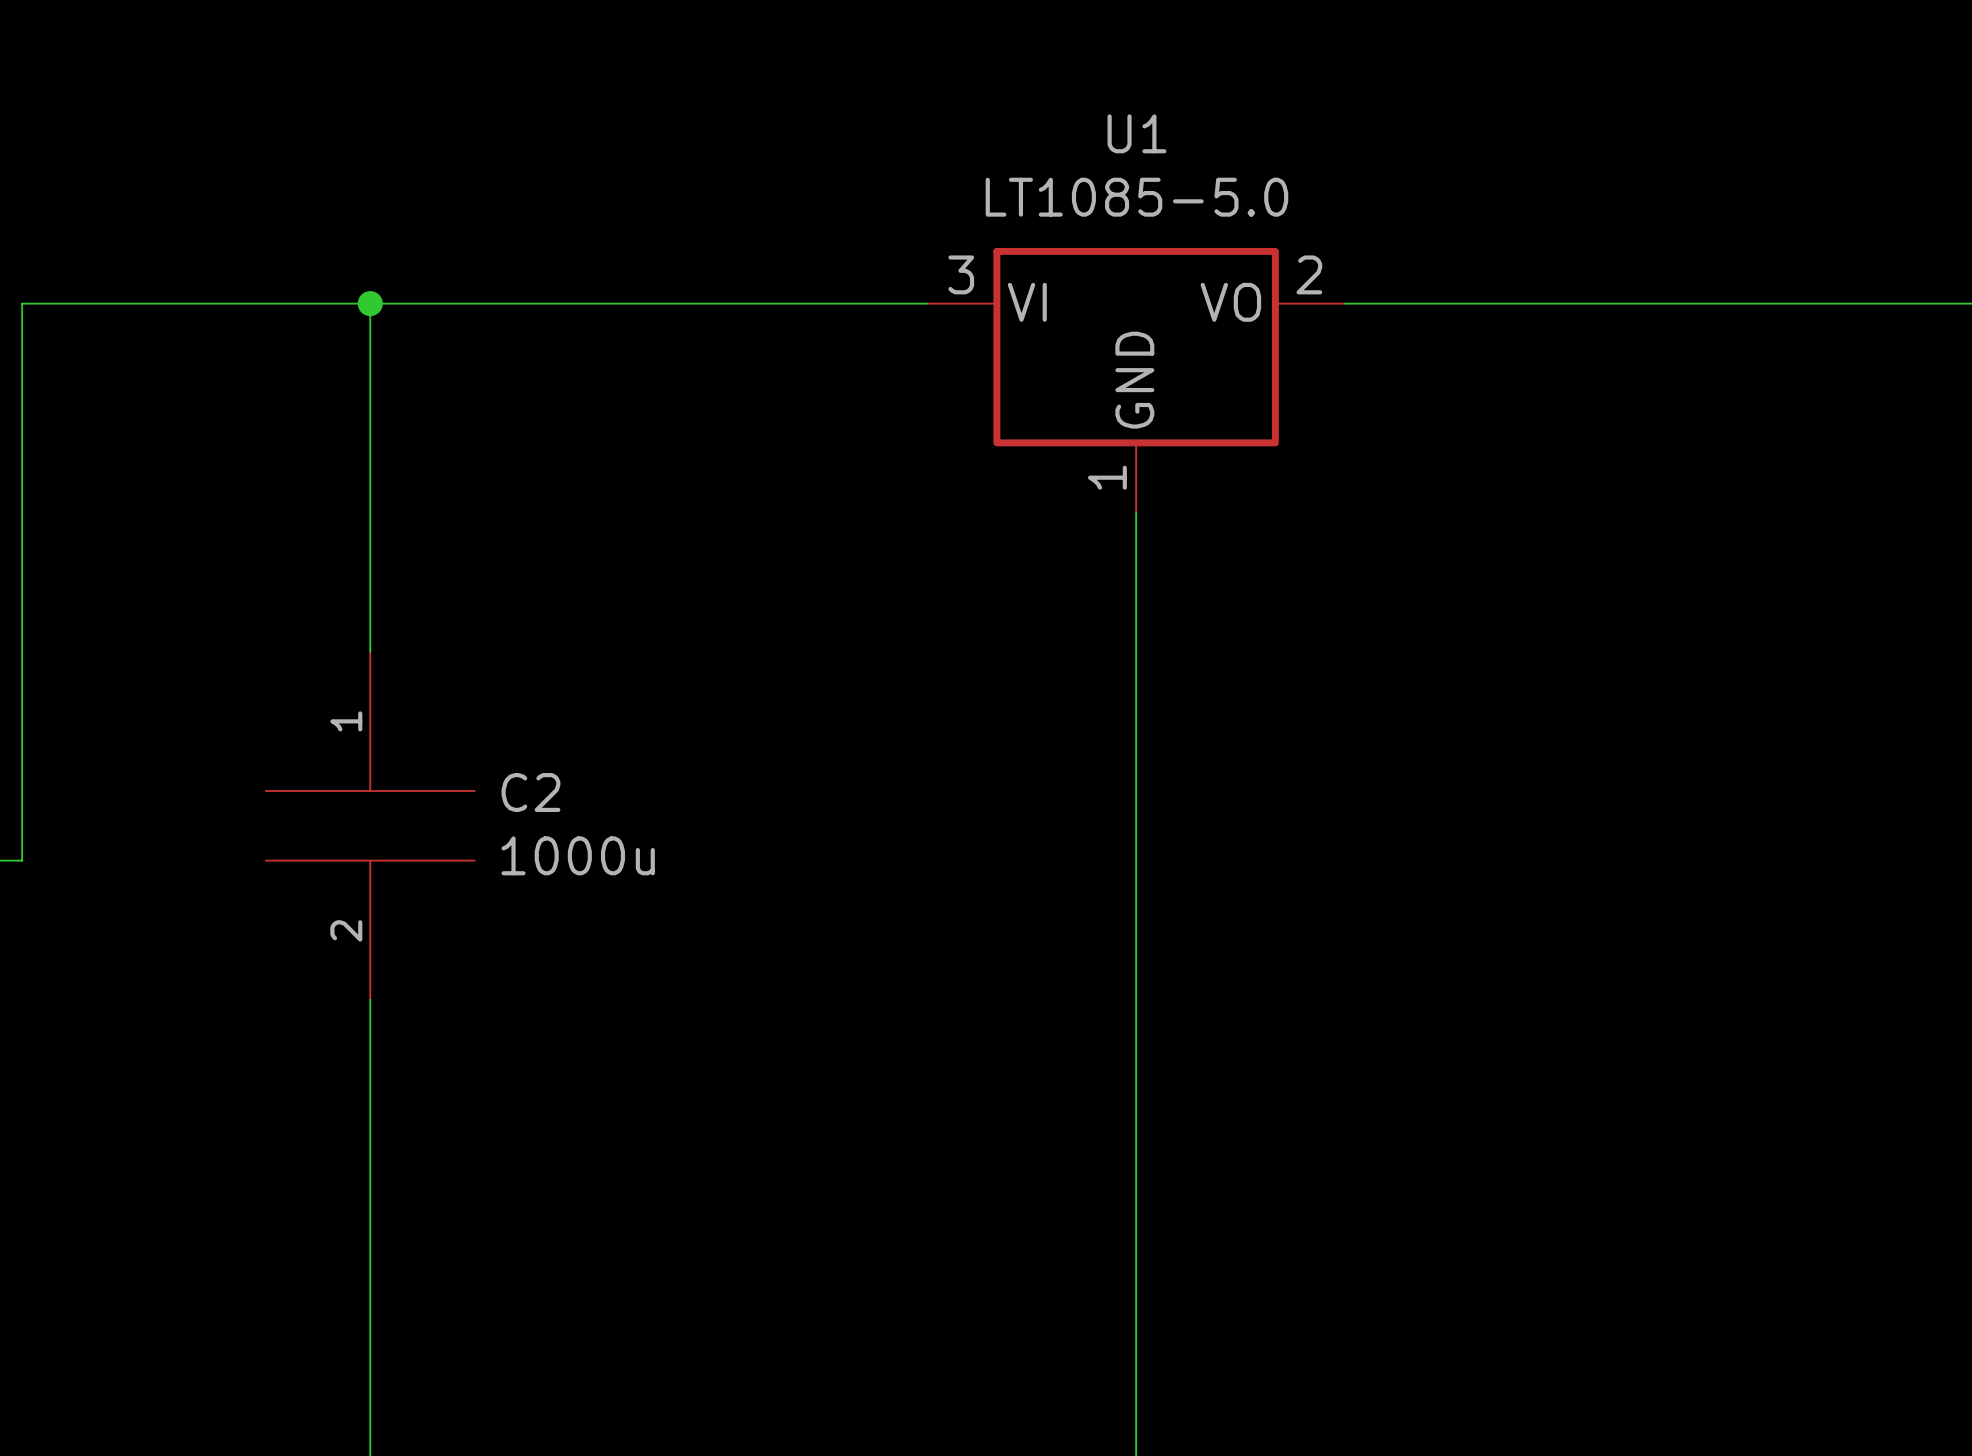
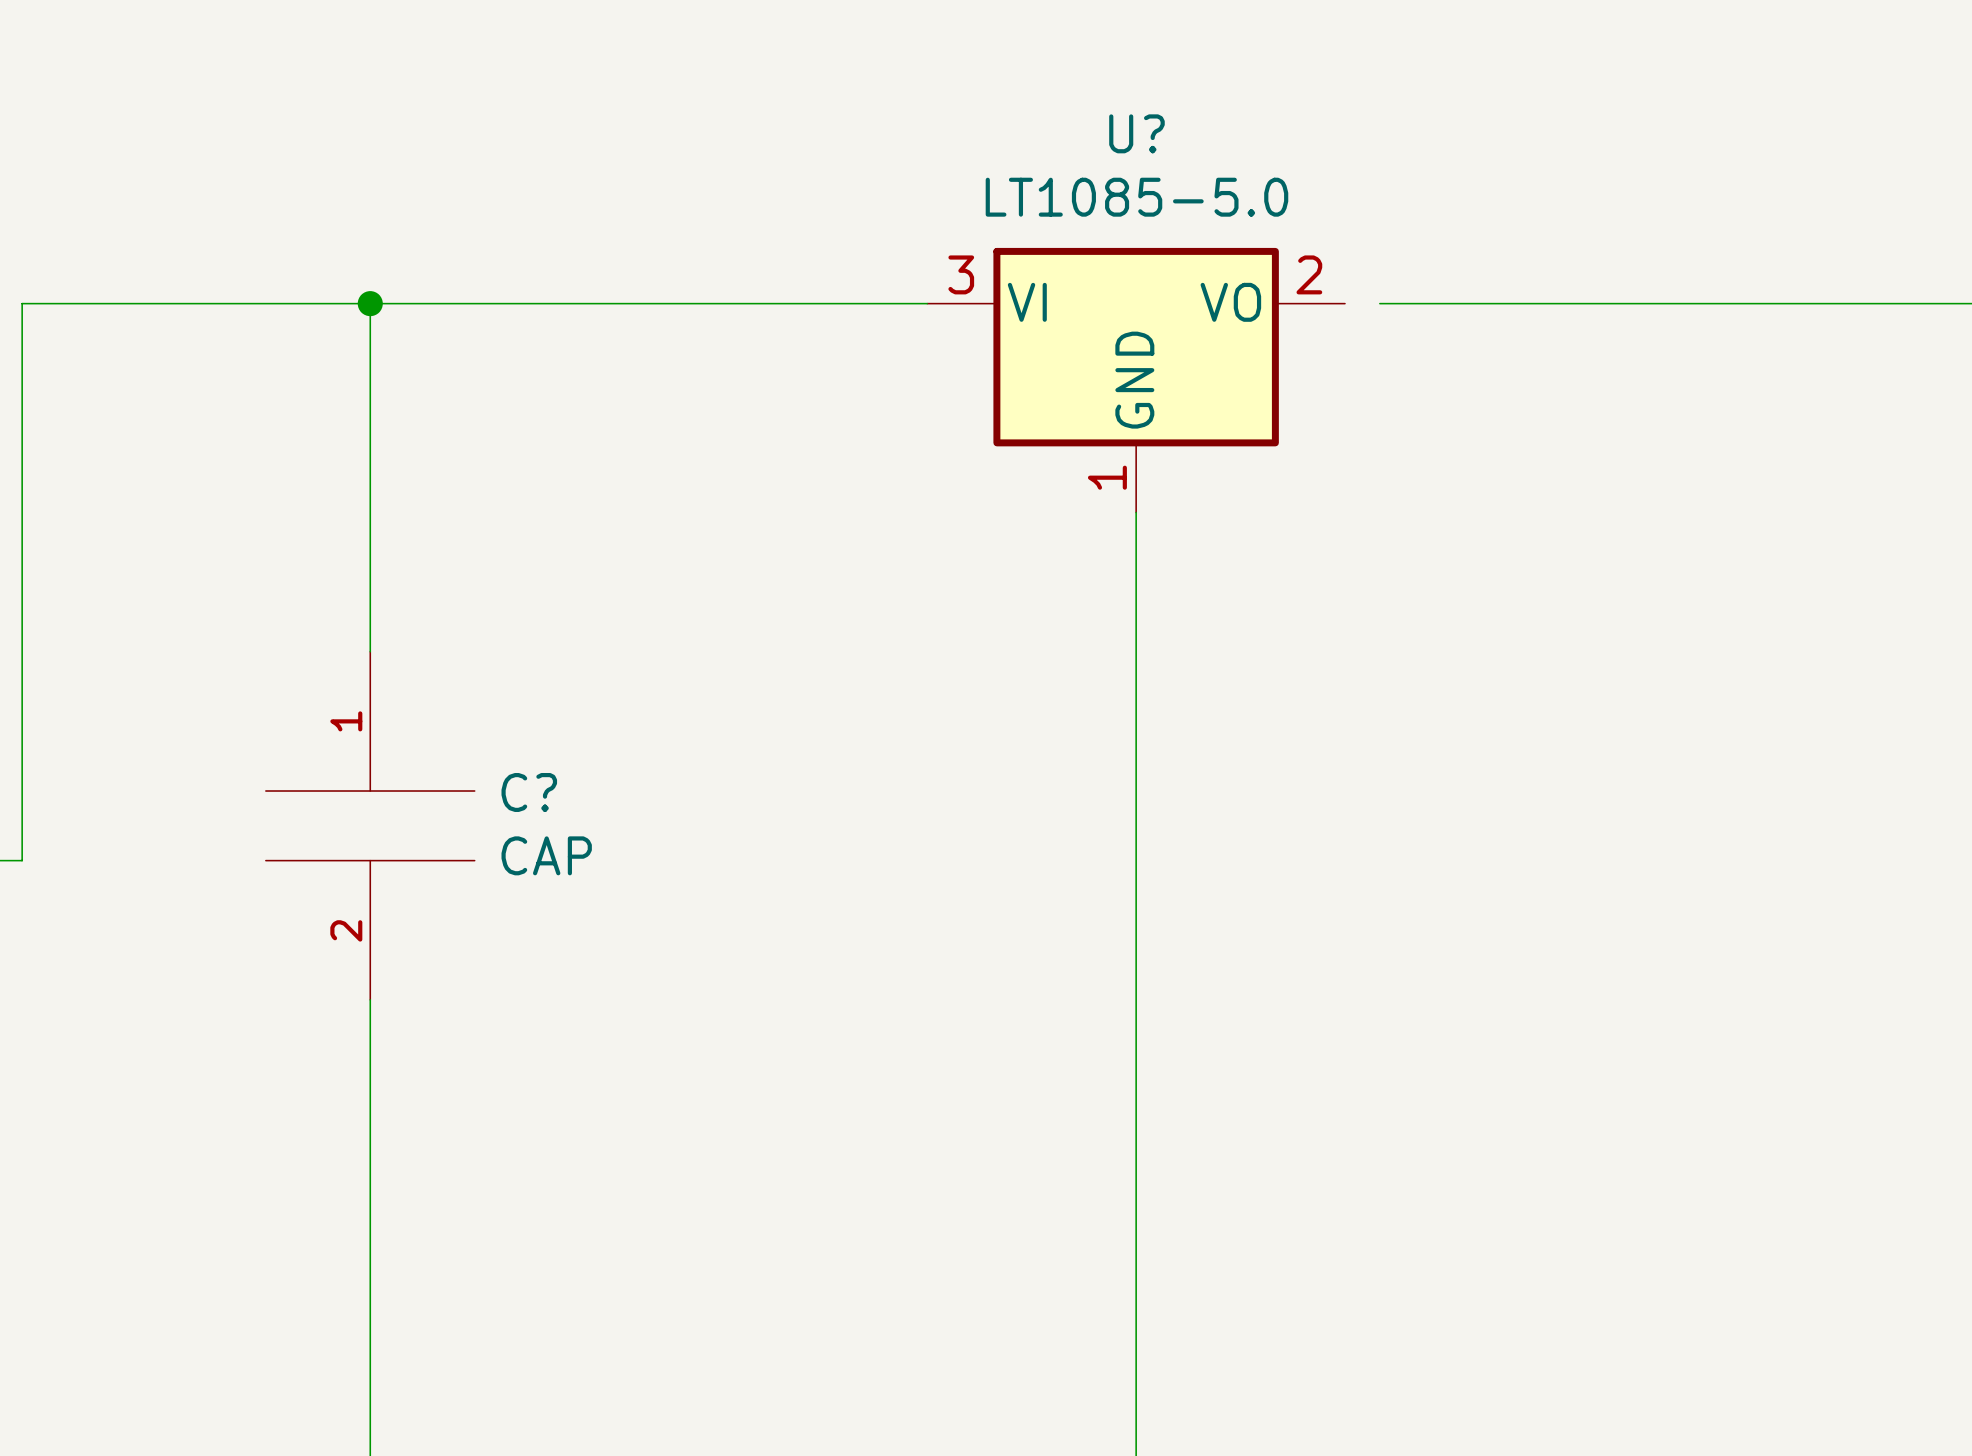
U1 name: U1 (1136, 133) -> U? (1136, 133)
wire: (1345, 303) (1379, 303) -> none
C2 name: C2 (530, 792) -> C? (529, 792)
C2 value: 1000u (578, 855) -> CAP (546, 855)

